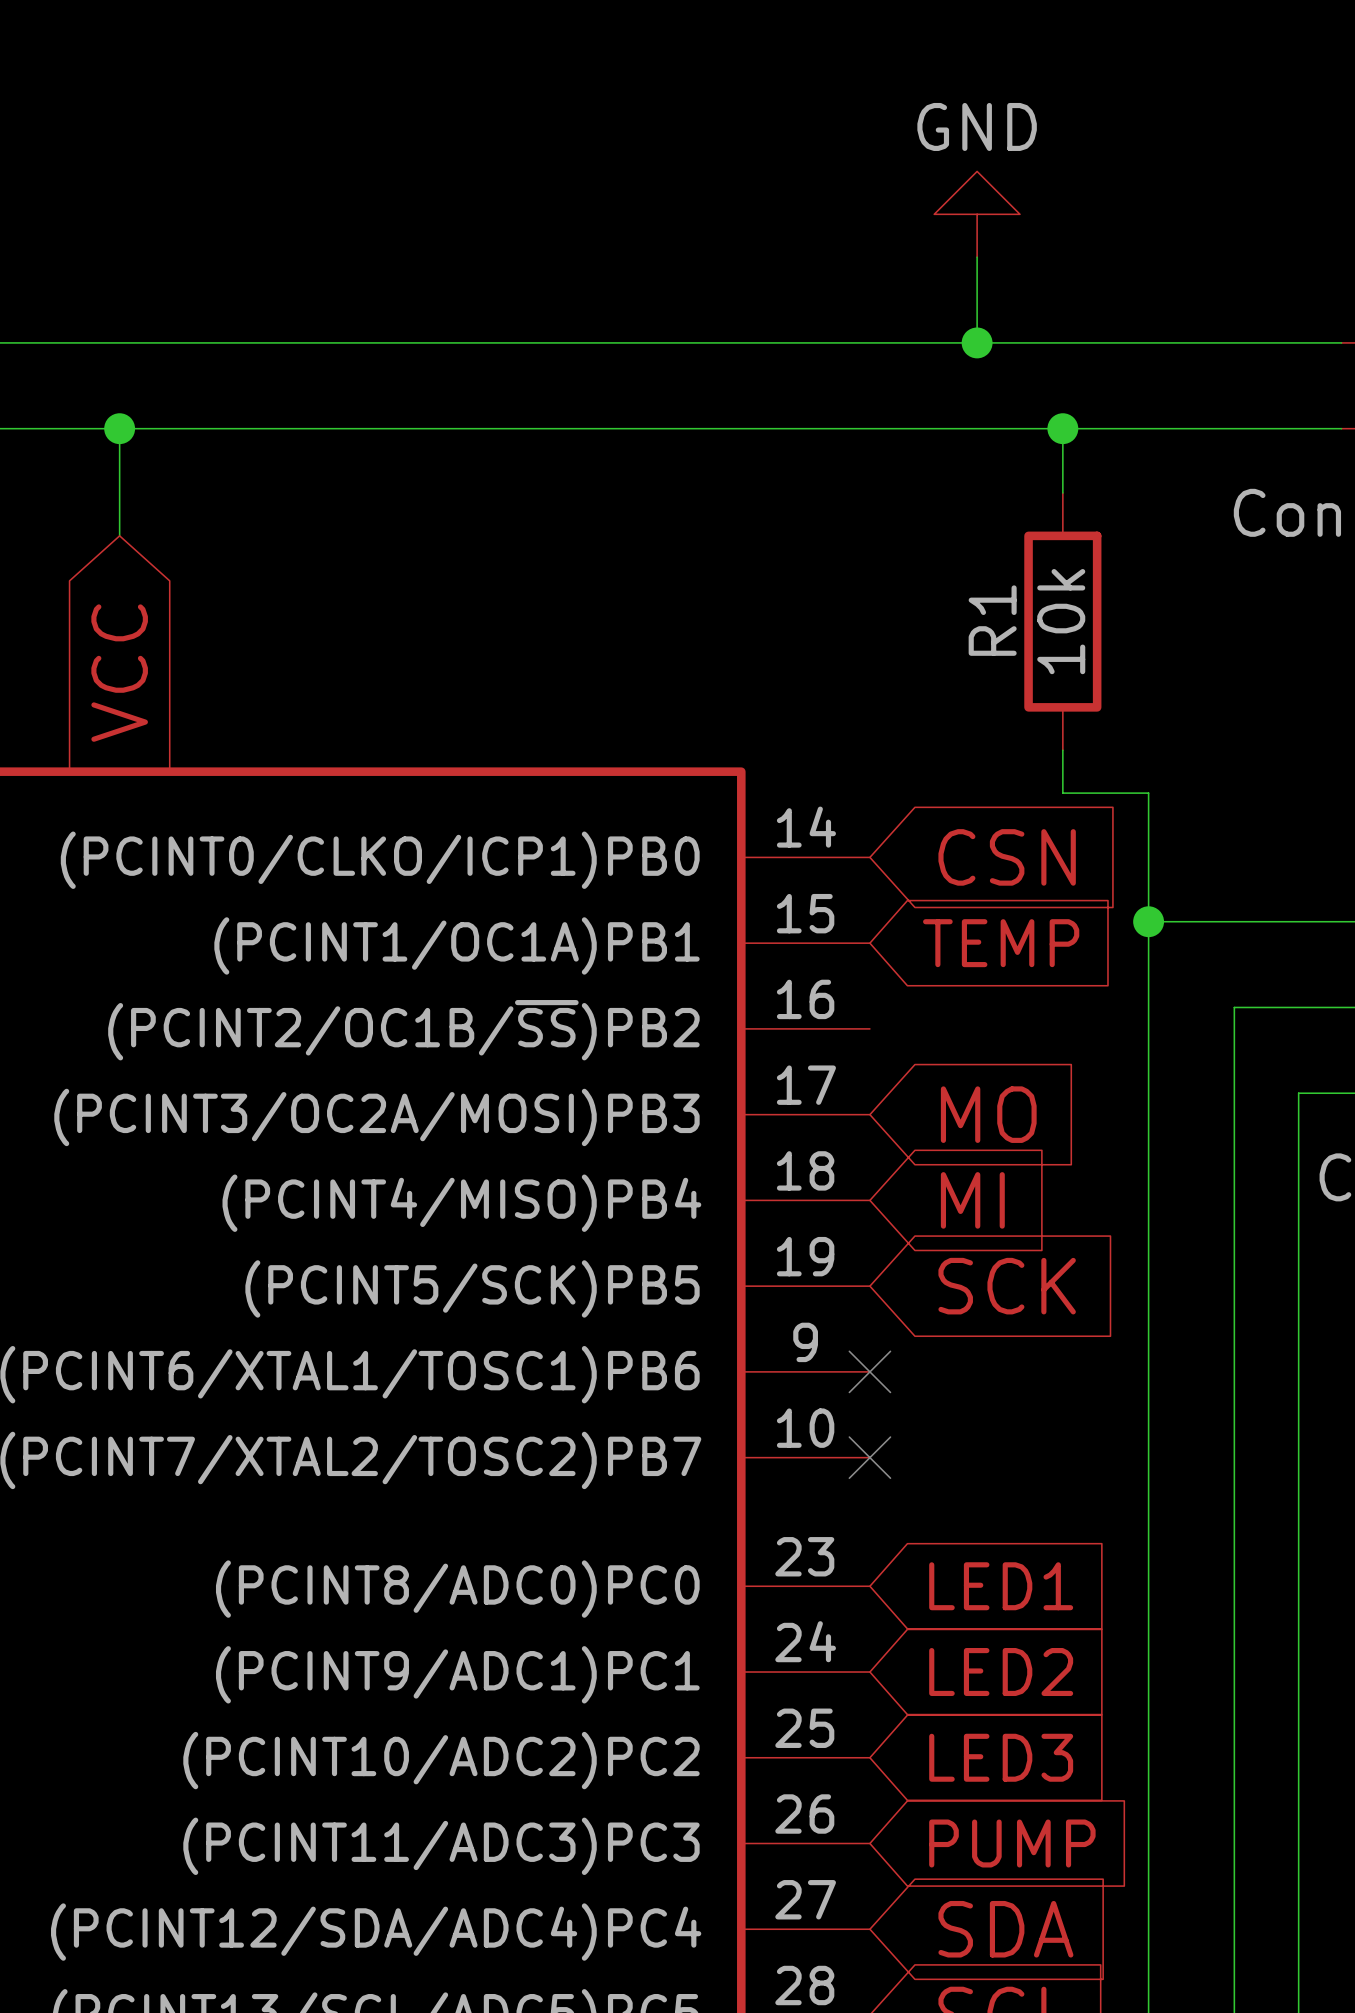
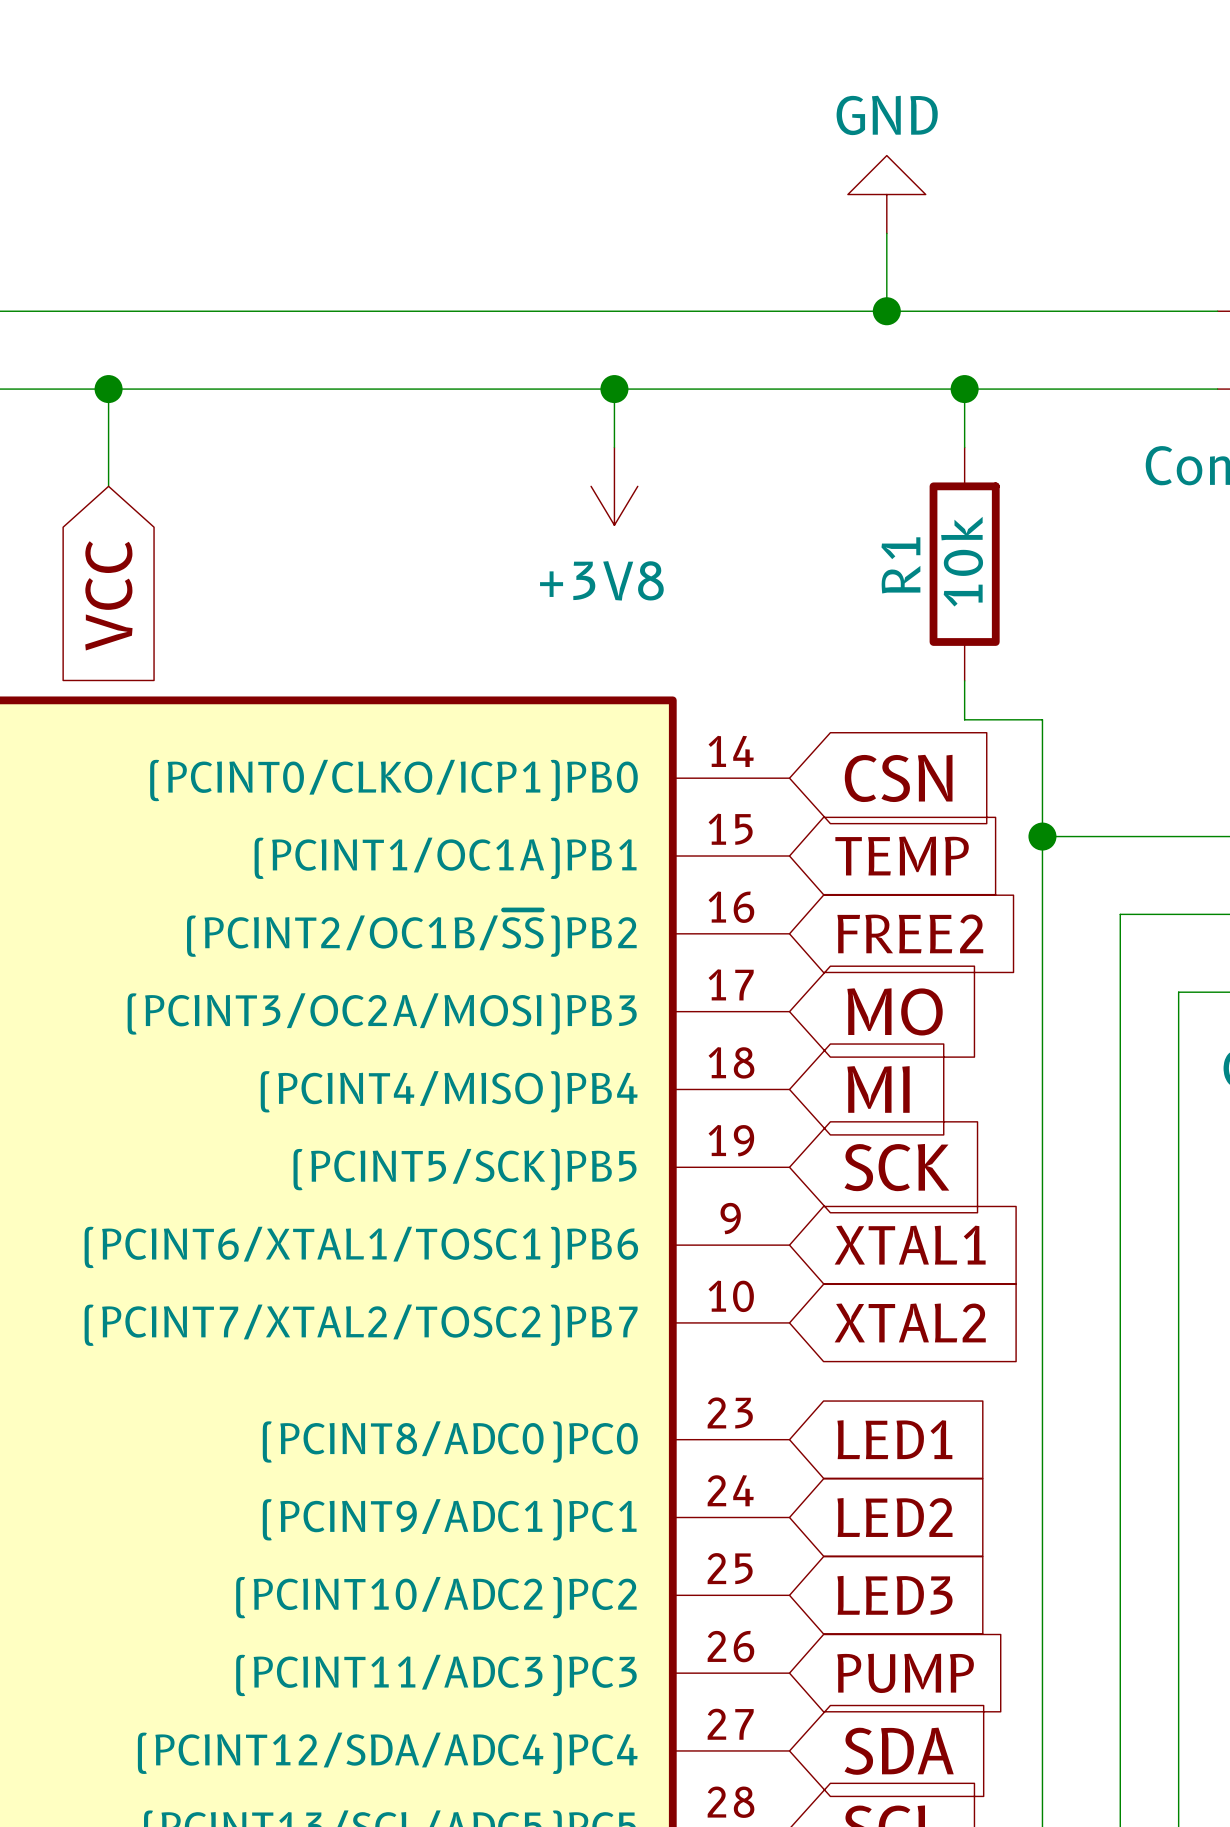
wire: none -> (614, 389) (614, 447)
junction: none -> (614, 389)
power symbol: none -> +3V8 (614, 486)
global label: none -> FREE2 (910, 933)
no-connect mark: (869, 1371) -> none
global label: none -> XTAL1 (910, 1245)
no-connect mark: (869, 1457) -> none
global label: none -> XTAL2 (910, 1322)

